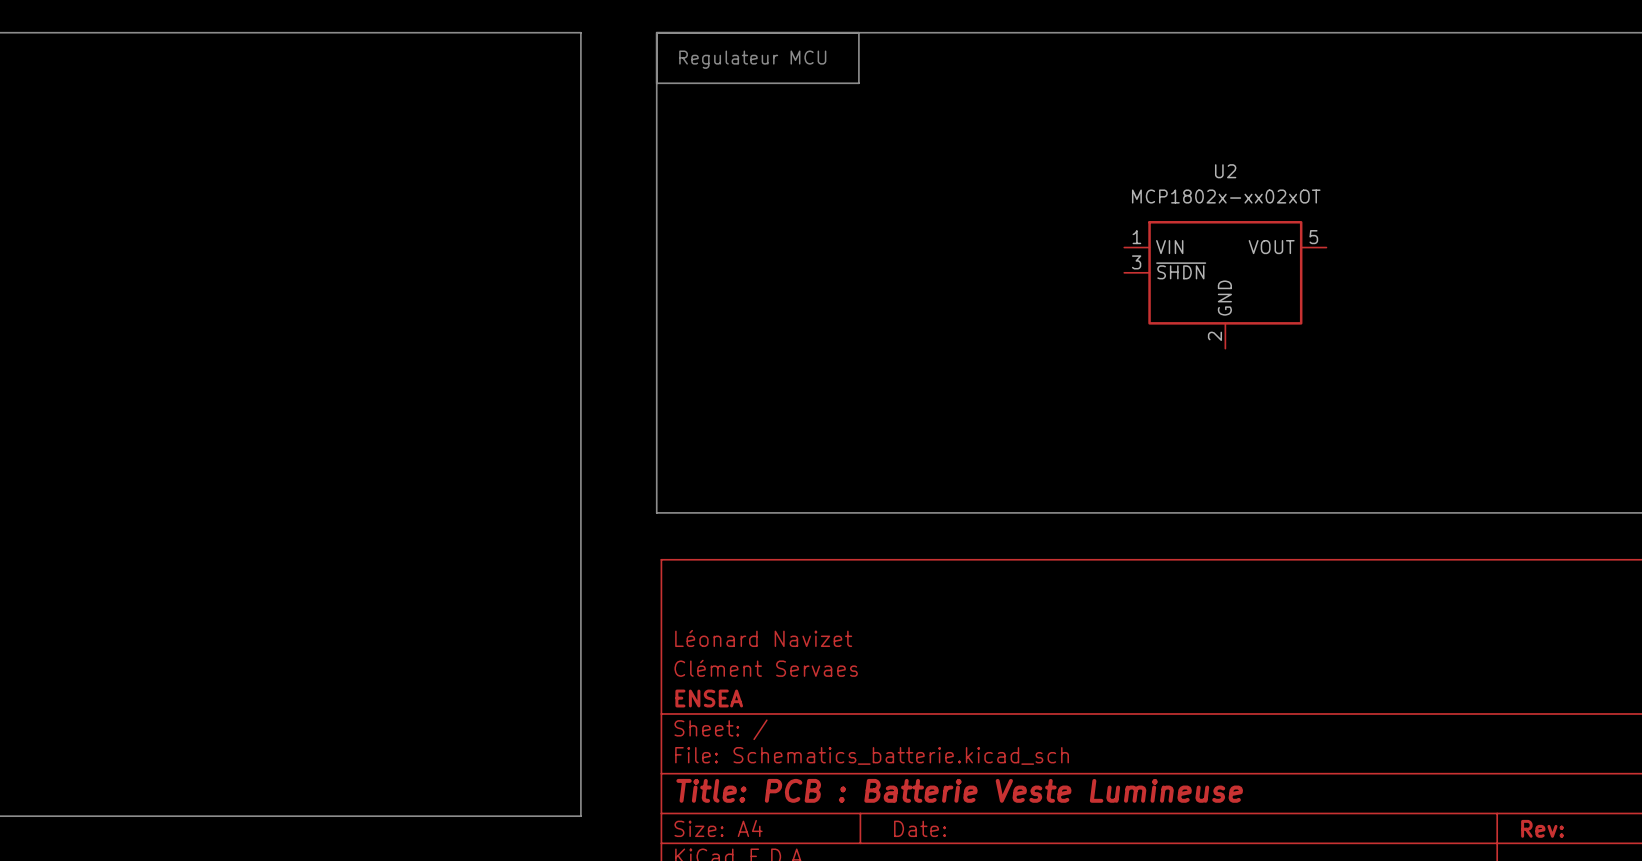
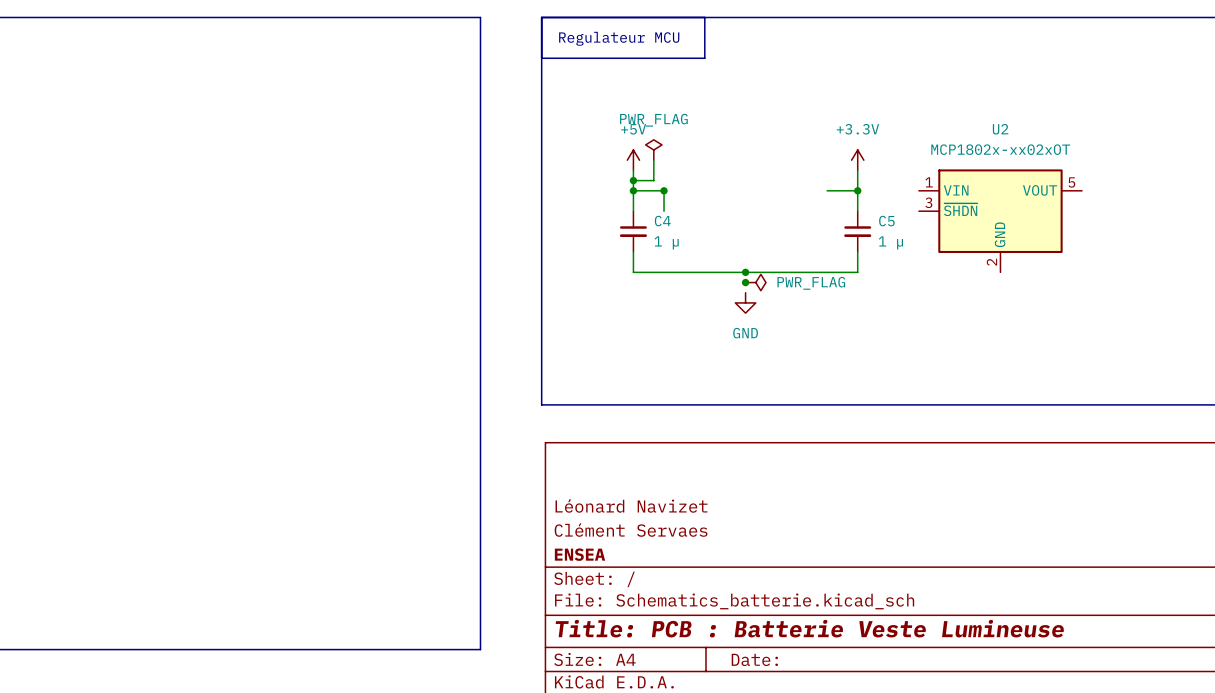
power symbol: none -> PWR_FLAG (653, 150)
power symbol: none -> +5V (633, 160)
wire: none -> (653, 160) (653, 180) (633, 180)
power symbol: none -> +3.3V (857, 160)
wire: none -> (633, 170) (633, 211)
wire: none -> (857, 170) (857, 211)
junction: none -> (633, 180)
wire: none -> (633, 190) (664, 190) (664, 211)
junction: none -> (633, 190)
junction: none -> (664, 190)
wire: none -> (827, 190) (857, 190)
junction: none -> (857, 190)
C4: none -> 1 µ (633, 231)
C5: none -> 1 µ (857, 231)
wire: none -> (633, 251) (633, 272) (857, 272) (857, 251)
junction: none -> (745, 272)
junction: none -> (745, 282)
power symbol: none -> PWR_FLAG (755, 282)
power symbol: none -> GND (745, 302)

